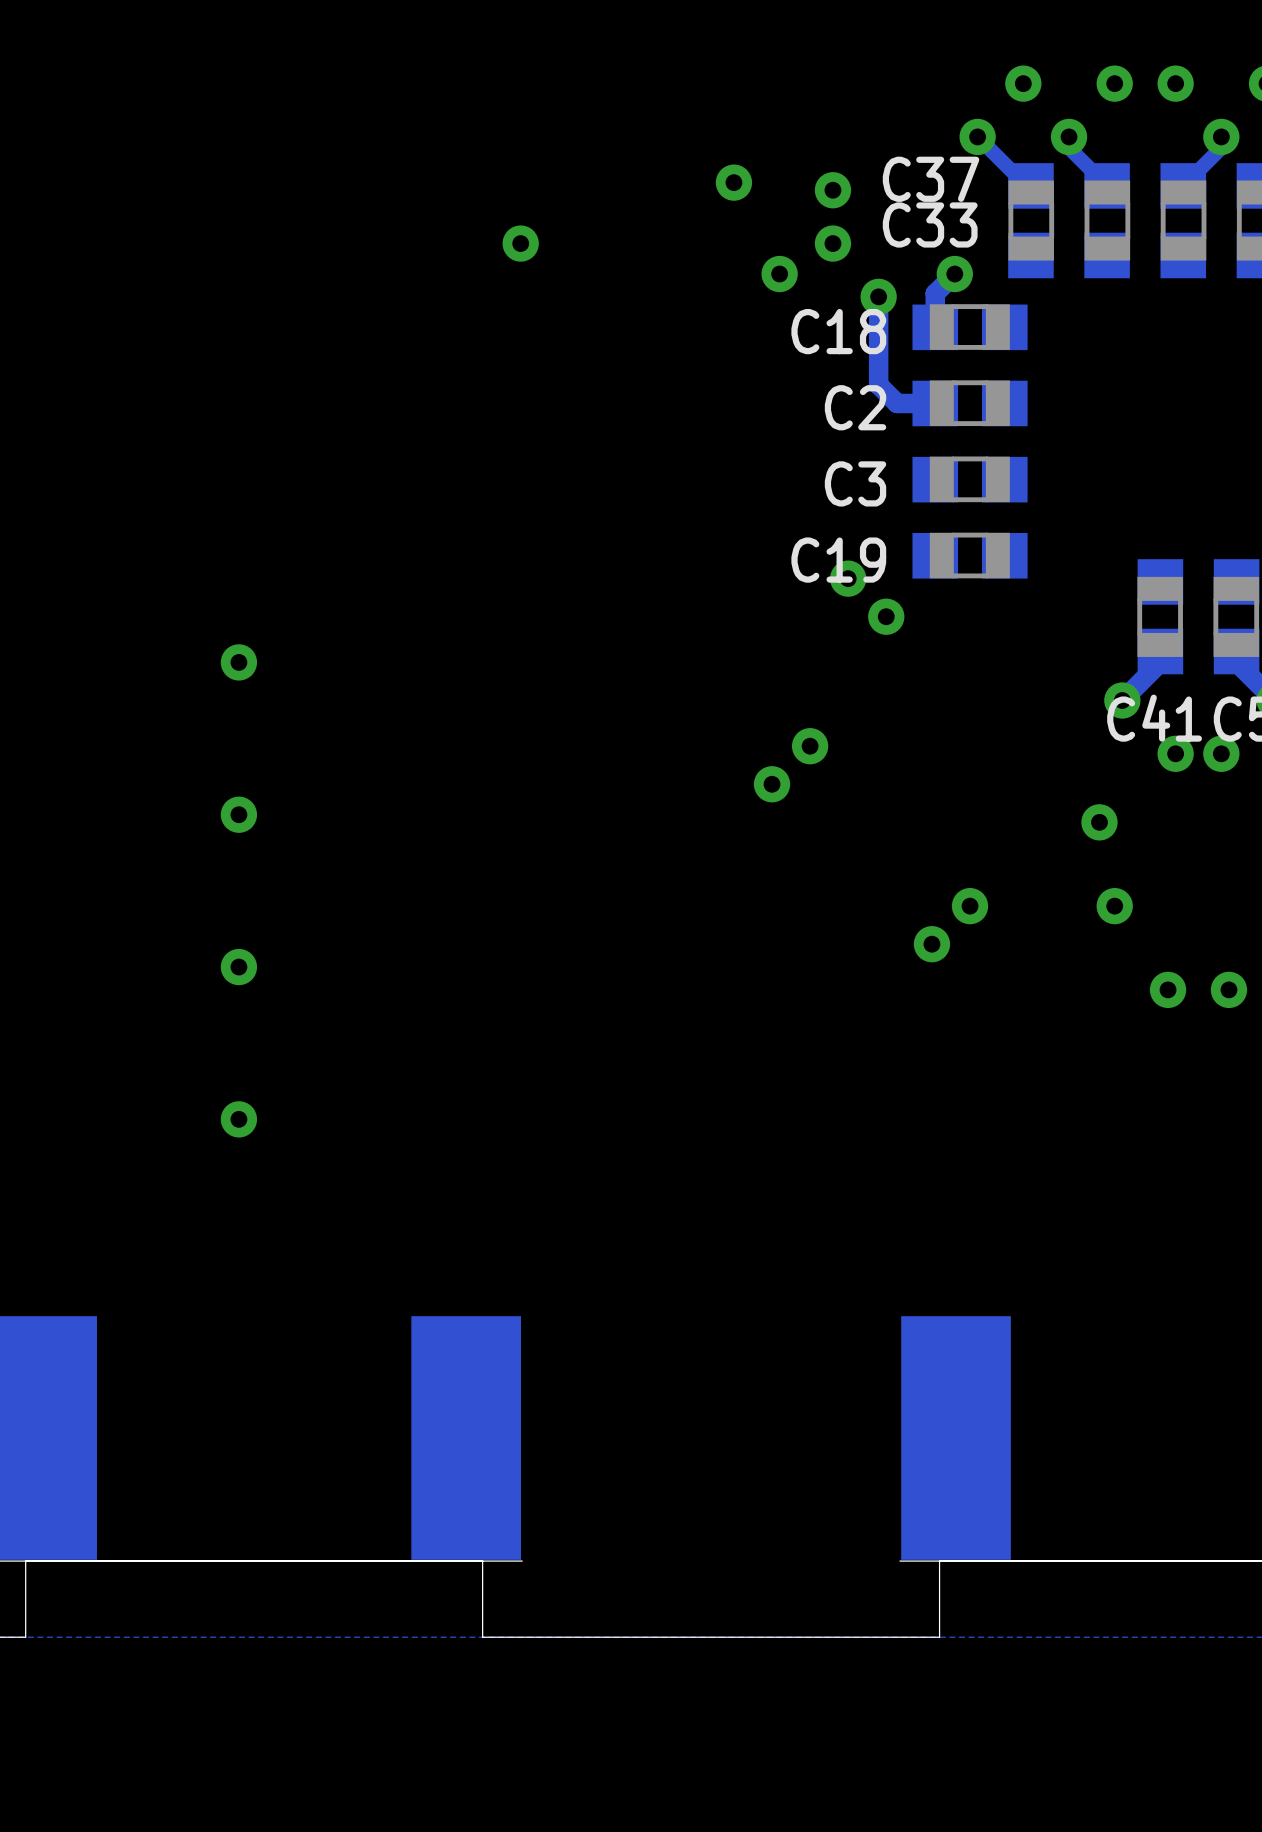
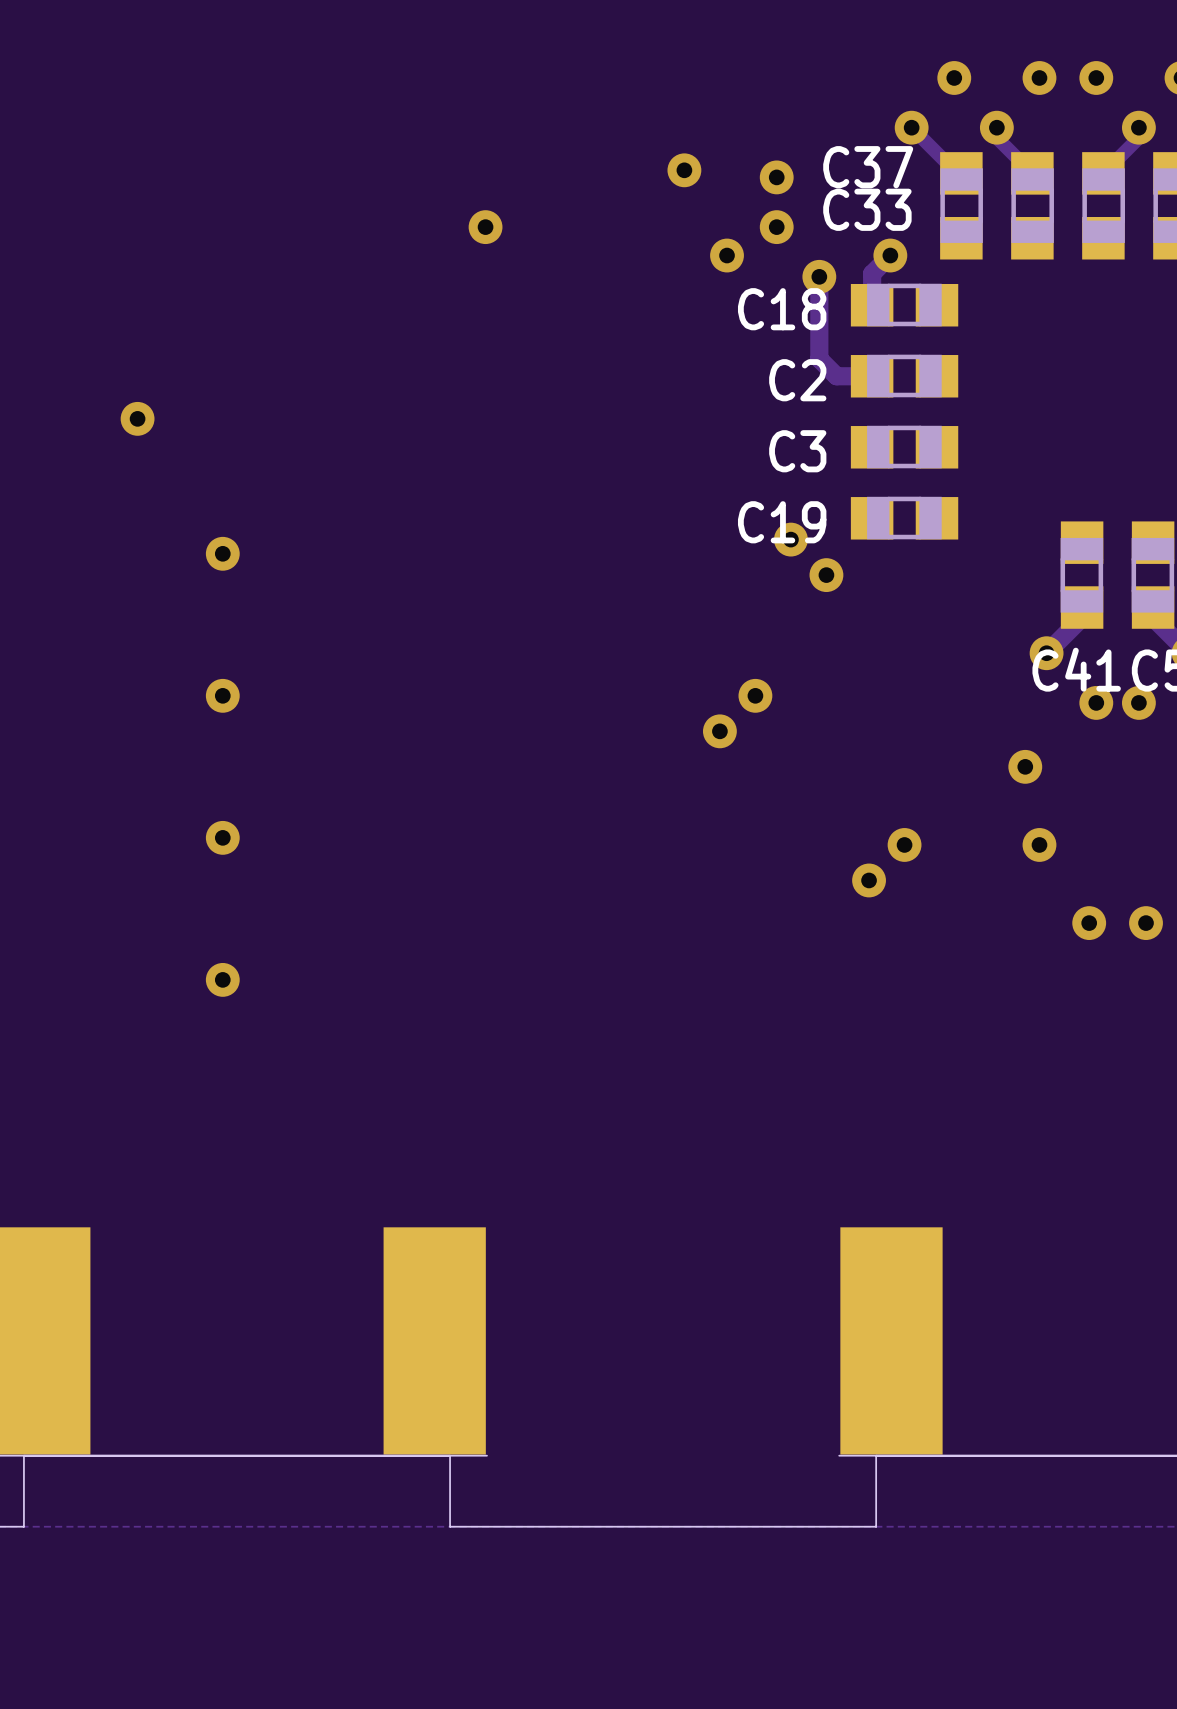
via: none -> (137, 418)
via: none -> (222, 553)
via: (238, 662) -> none
via: none -> (222, 695)
via: (238, 814) -> none
via: none -> (222, 837)
via: (238, 967) -> none
via: none -> (222, 979)
via: (238, 1119) -> none

